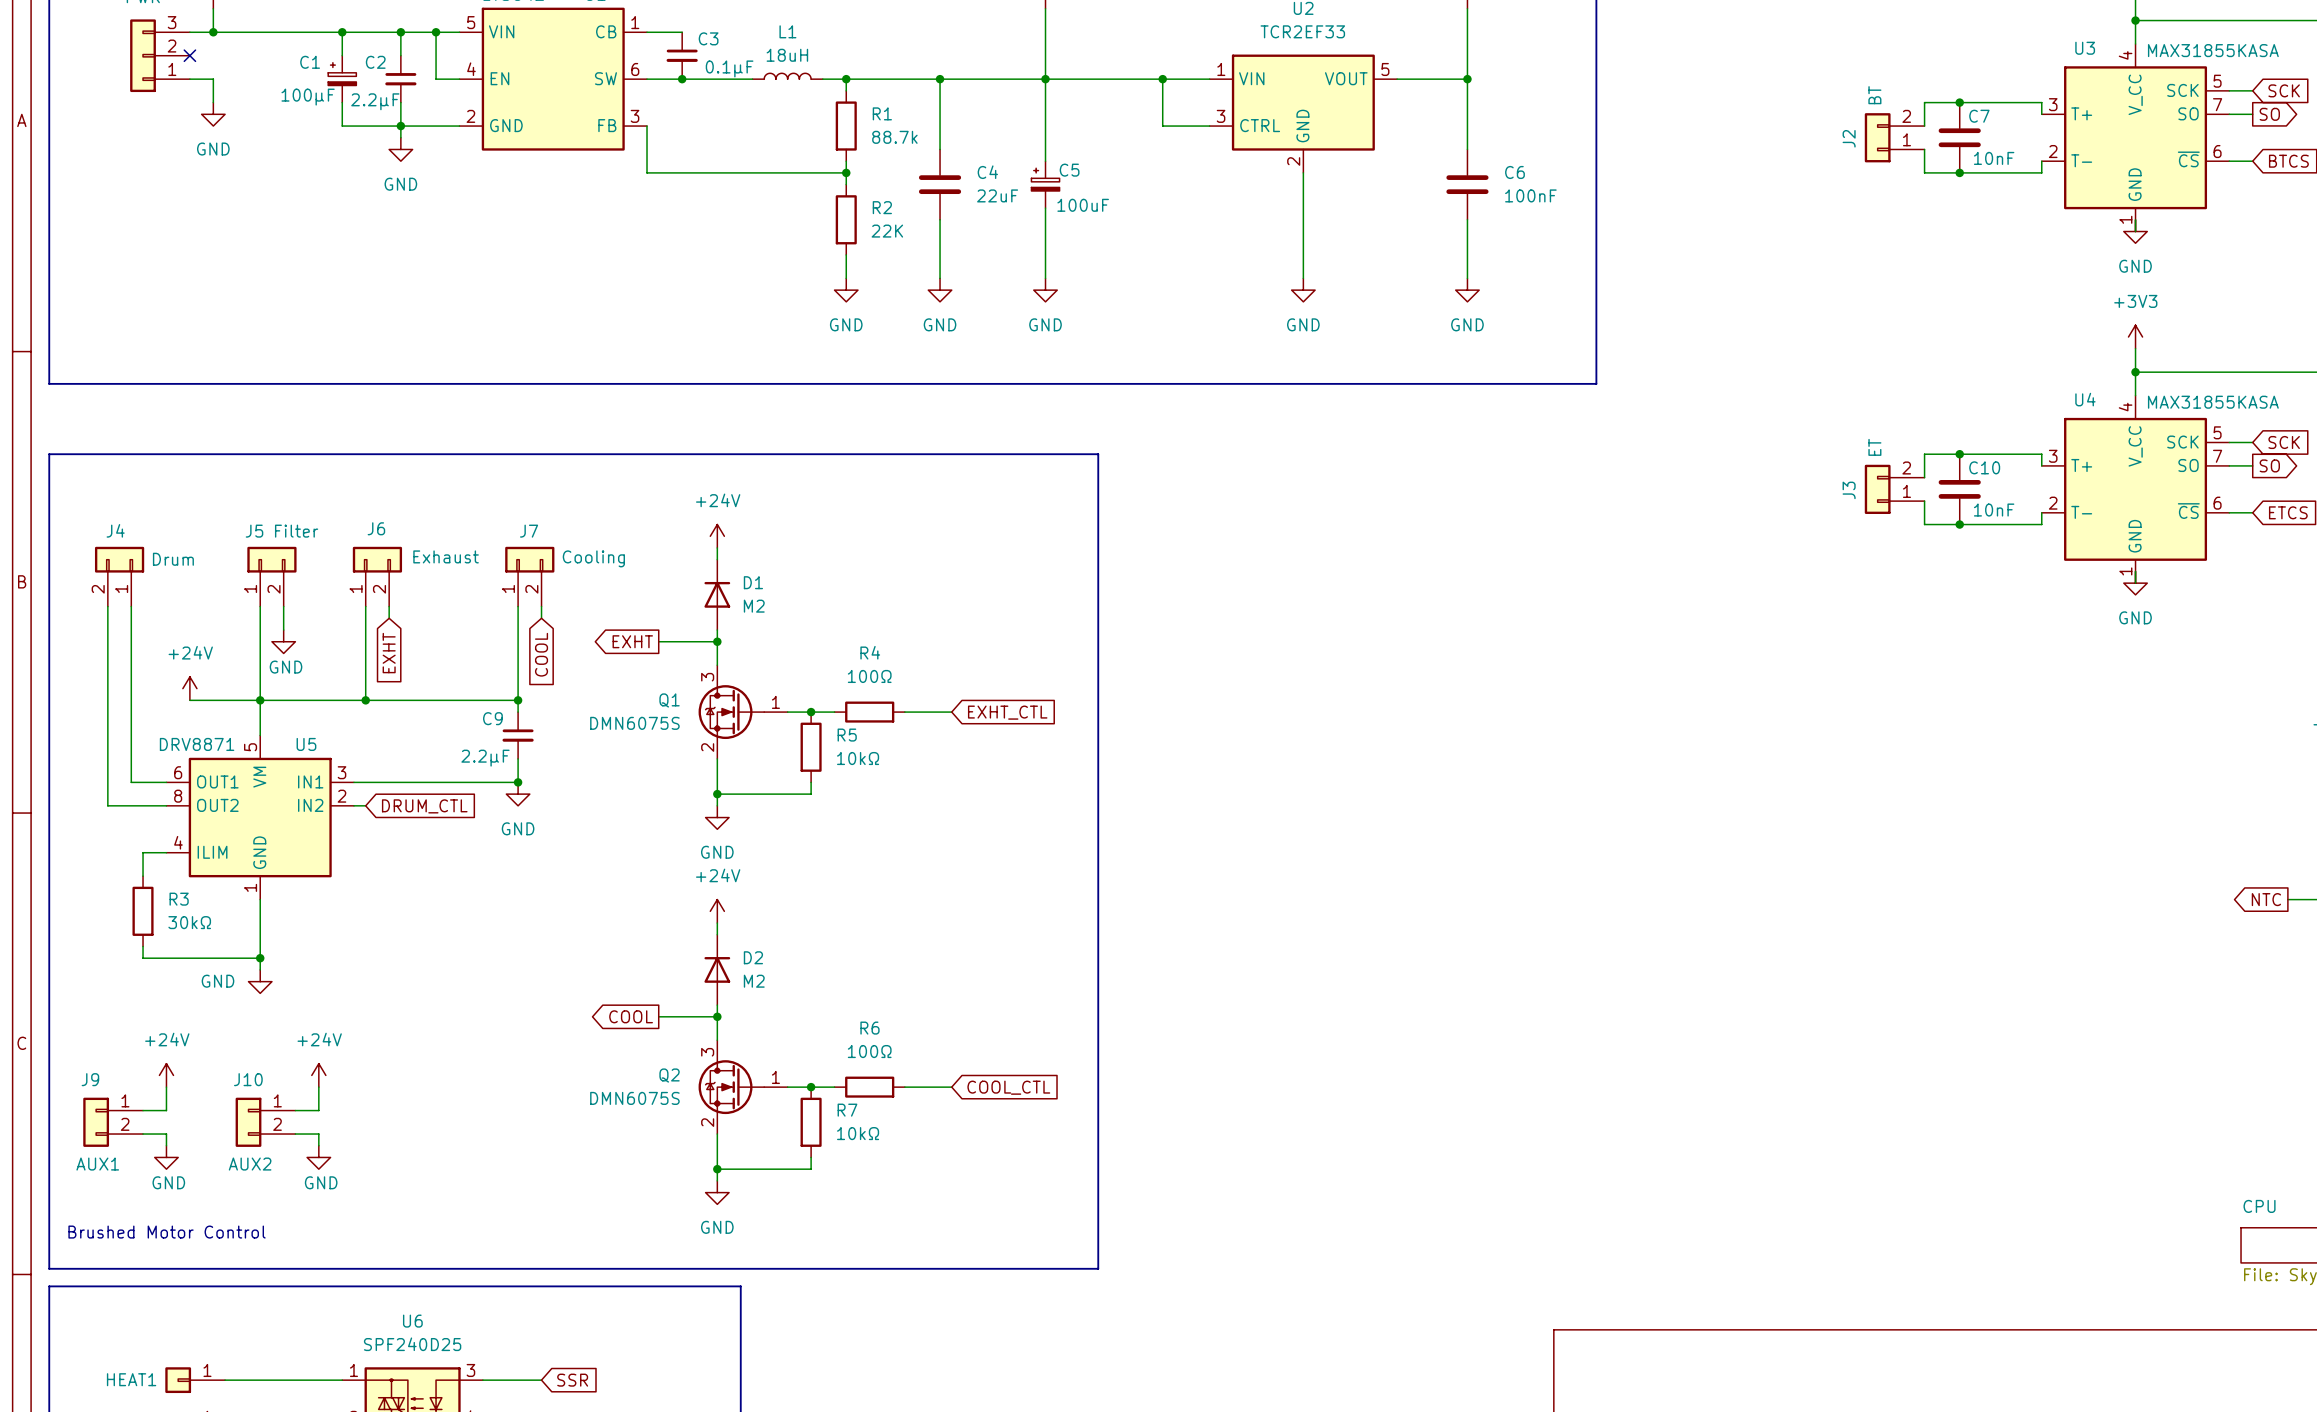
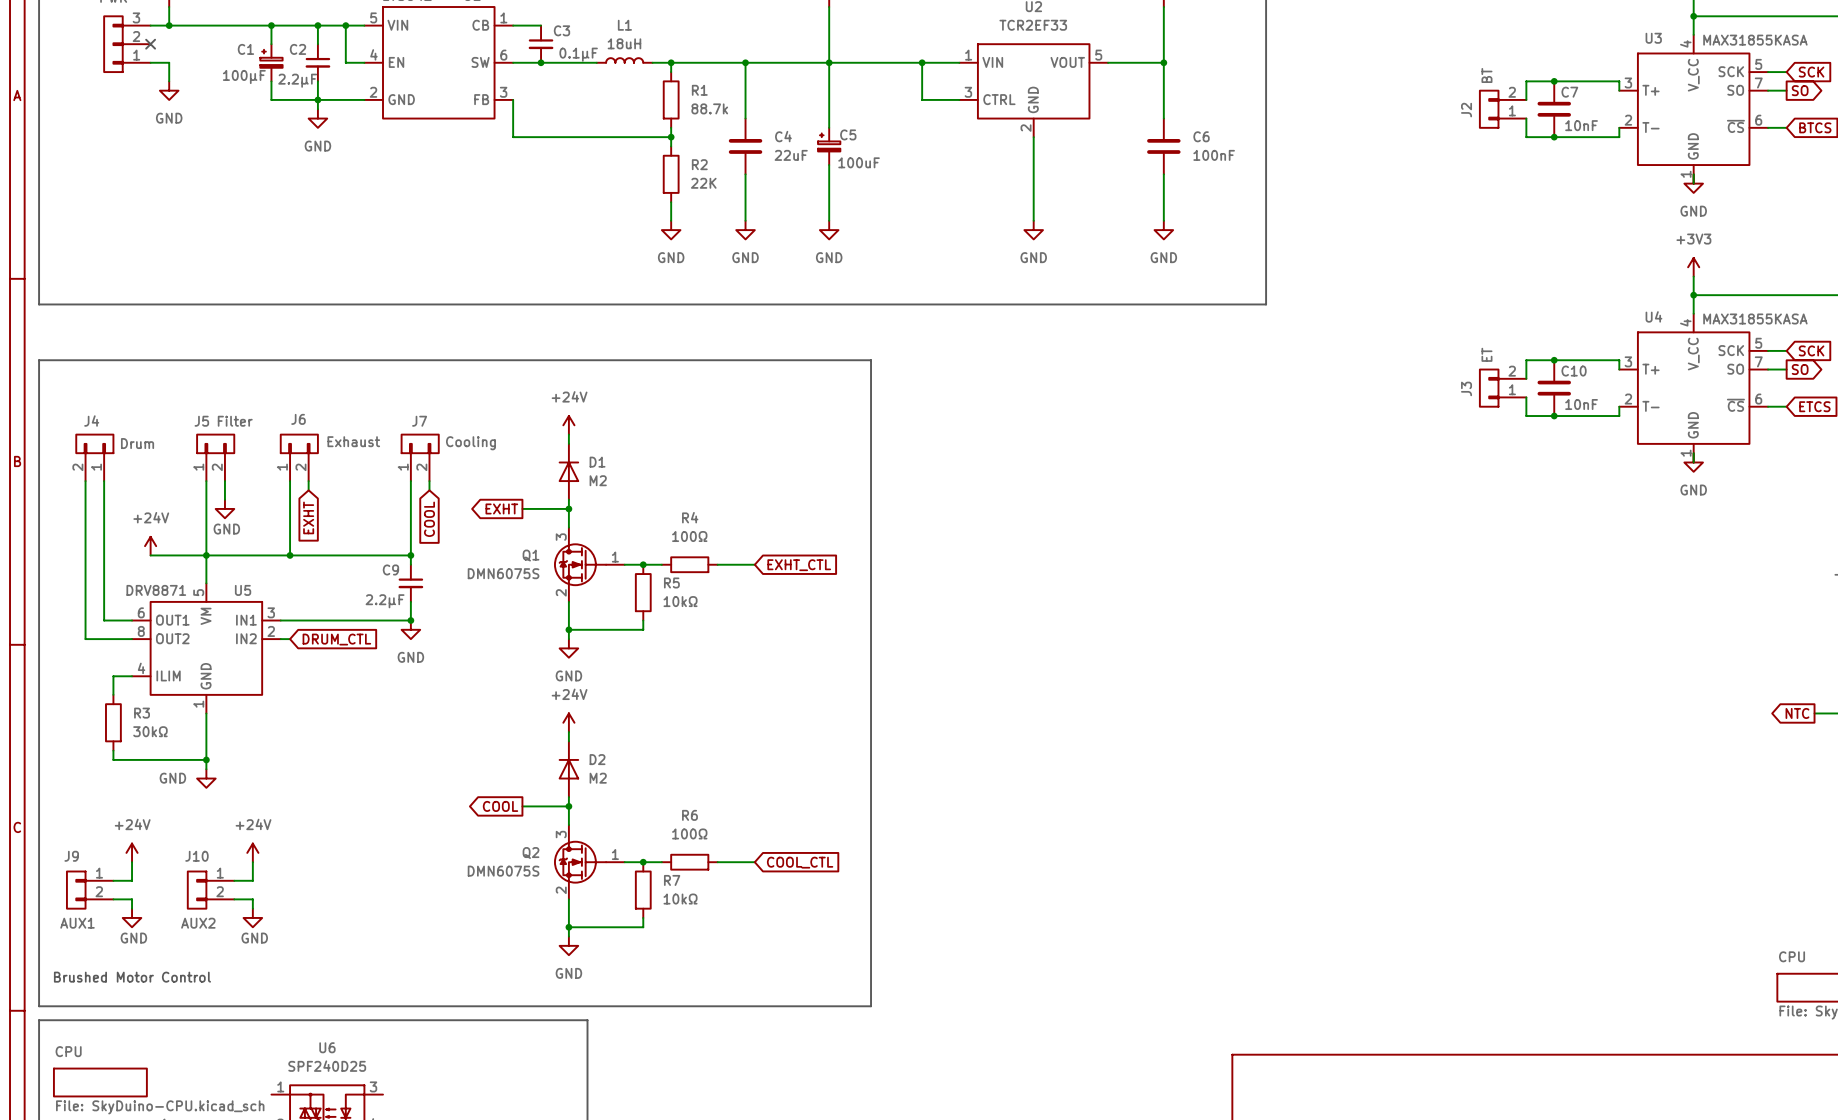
sheet CPU: none -> File: SkyDuino-CPU.kicad_sch (100, 1082)
HEAT1: (195, 1380) -> none
wire: (225, 1380) (342, 1380) -> none
wire: (482, 1380) (541, 1380) -> none
global label: SSR (572, 1380) -> none

